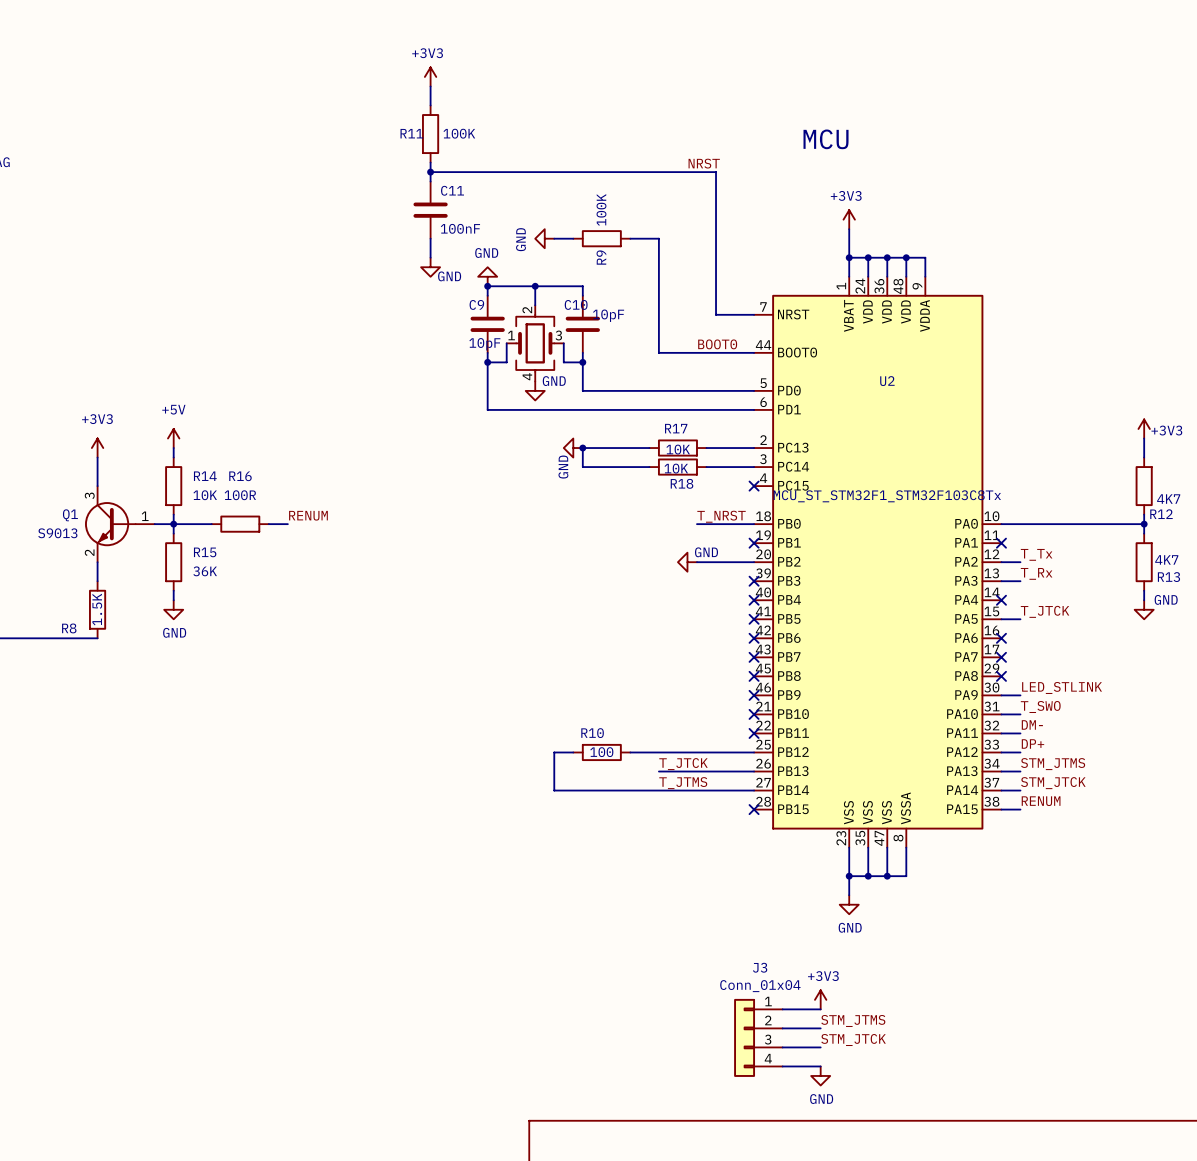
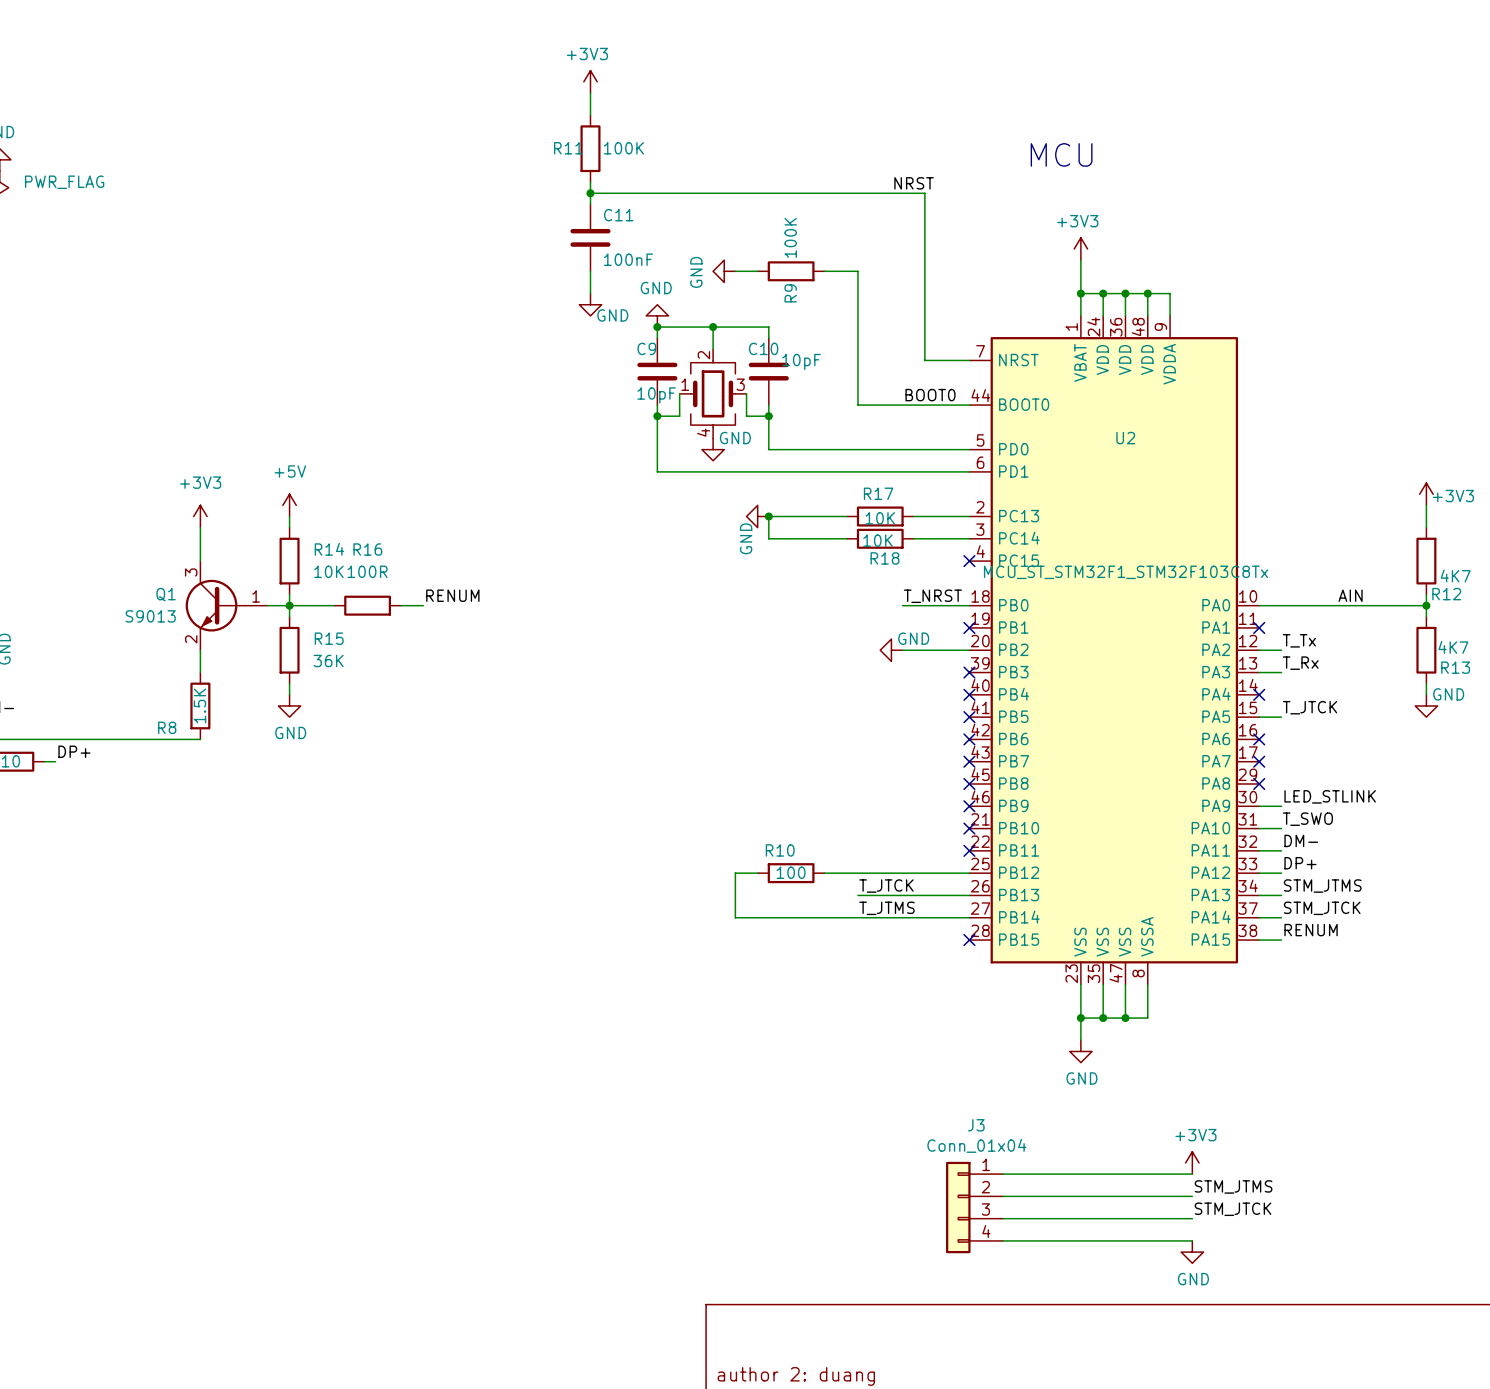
label: none -> AIN (1350, 595)
power symbol position: +3V3 (820, 999) -> +3V3 (1192, 1162)
wire: none -> (1047, 1174) (1192, 1174)
label position: STM_JTMS (853, 1020) -> STM_JTMS (1233, 1186)
wire: none -> (1047, 1196) (1192, 1196)
label position: STM_JTCK (853, 1040) -> STM_JTCK (1233, 1209)
wire: none -> (1047, 1218) (1192, 1218)
wire: none -> (1047, 1240) (1192, 1240)
power symbol position: GND (820, 1075) -> GND (1192, 1252)

